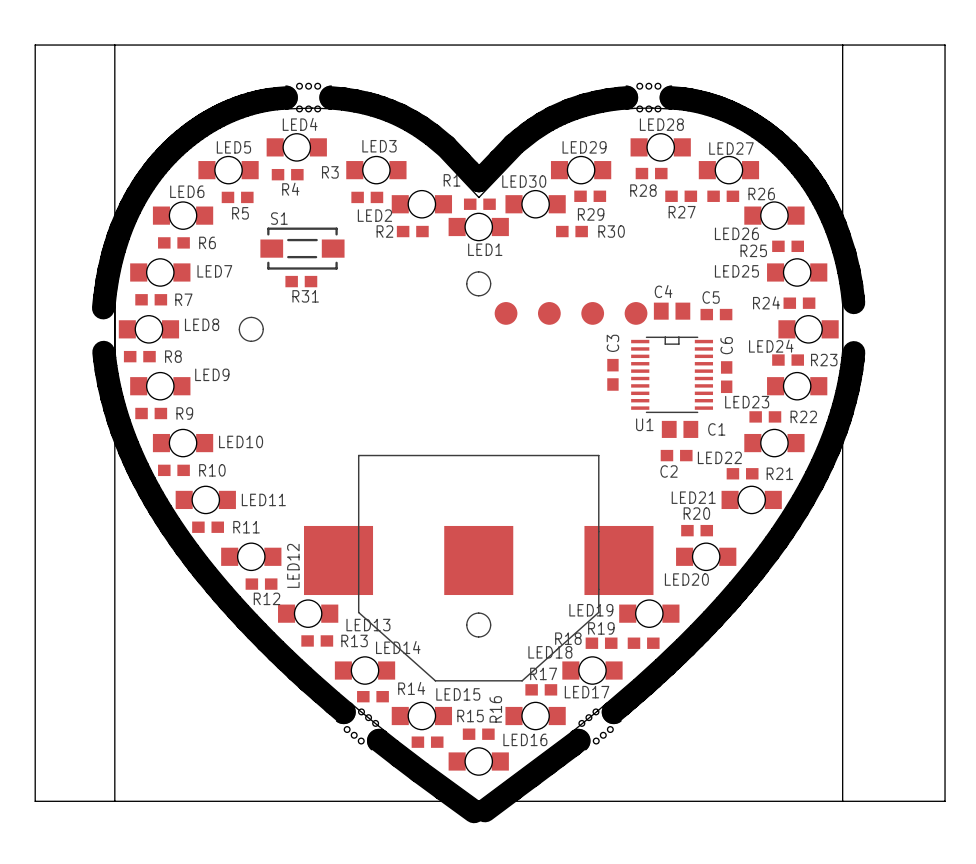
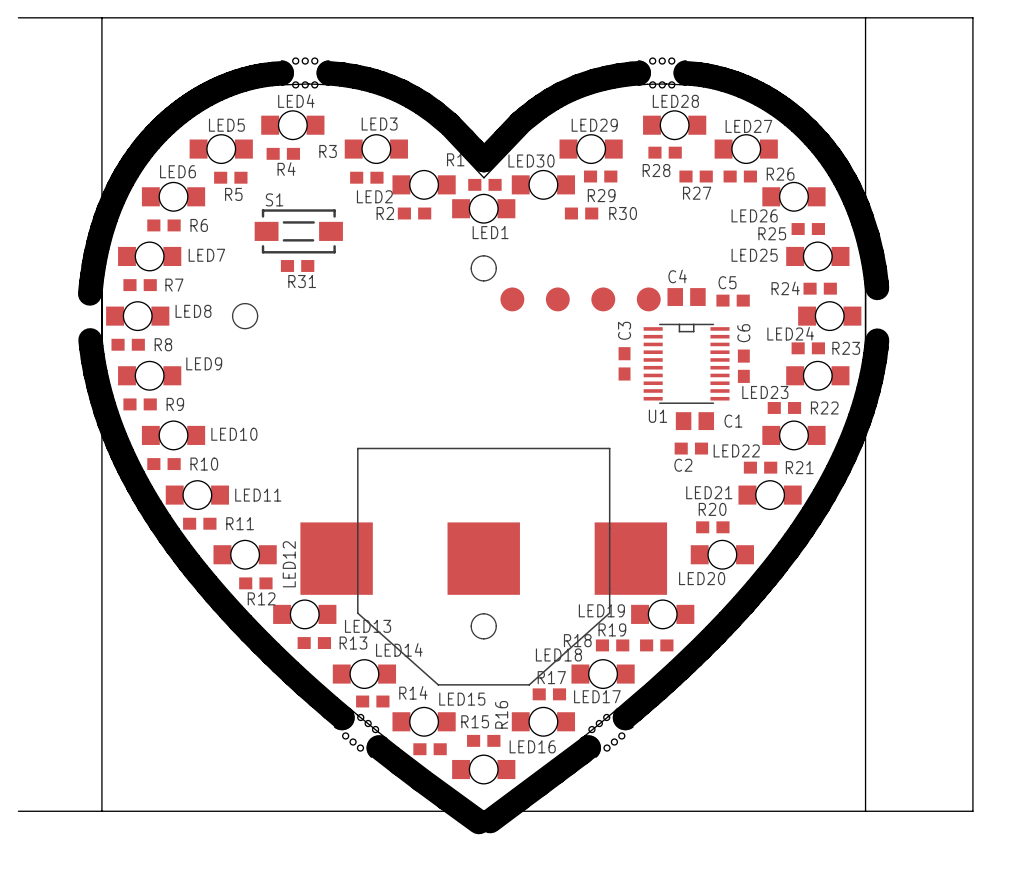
board edge: (35, 45) (35, 801) -> none

